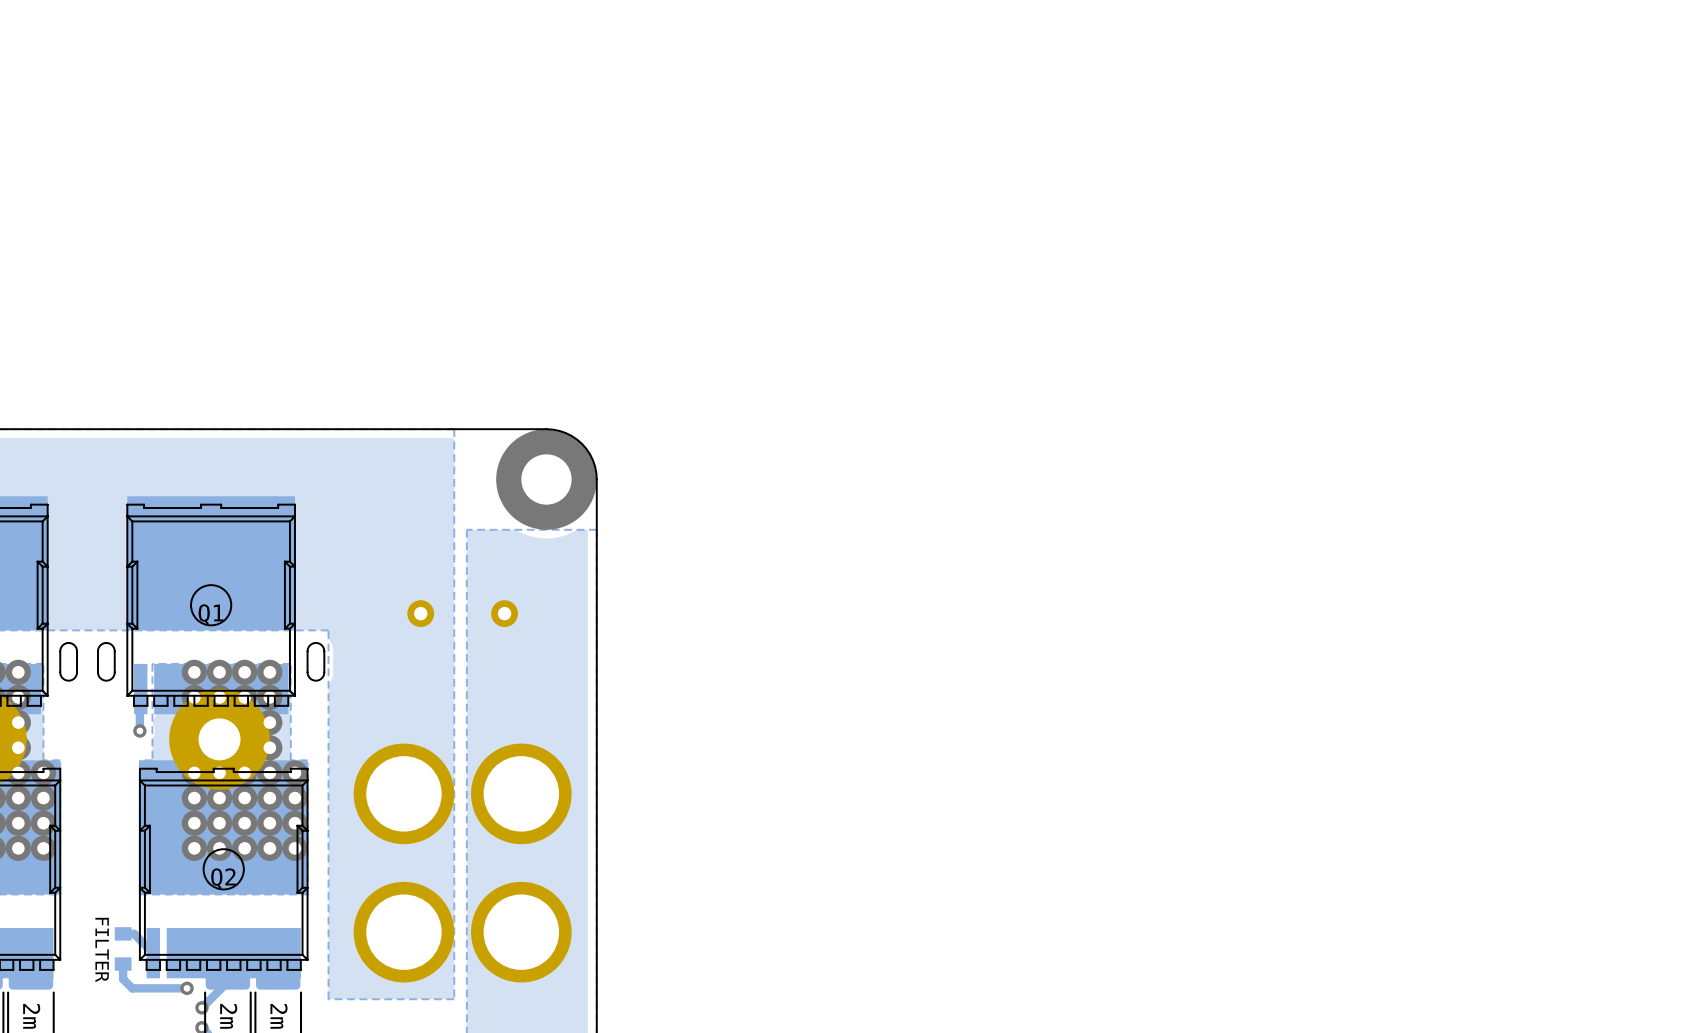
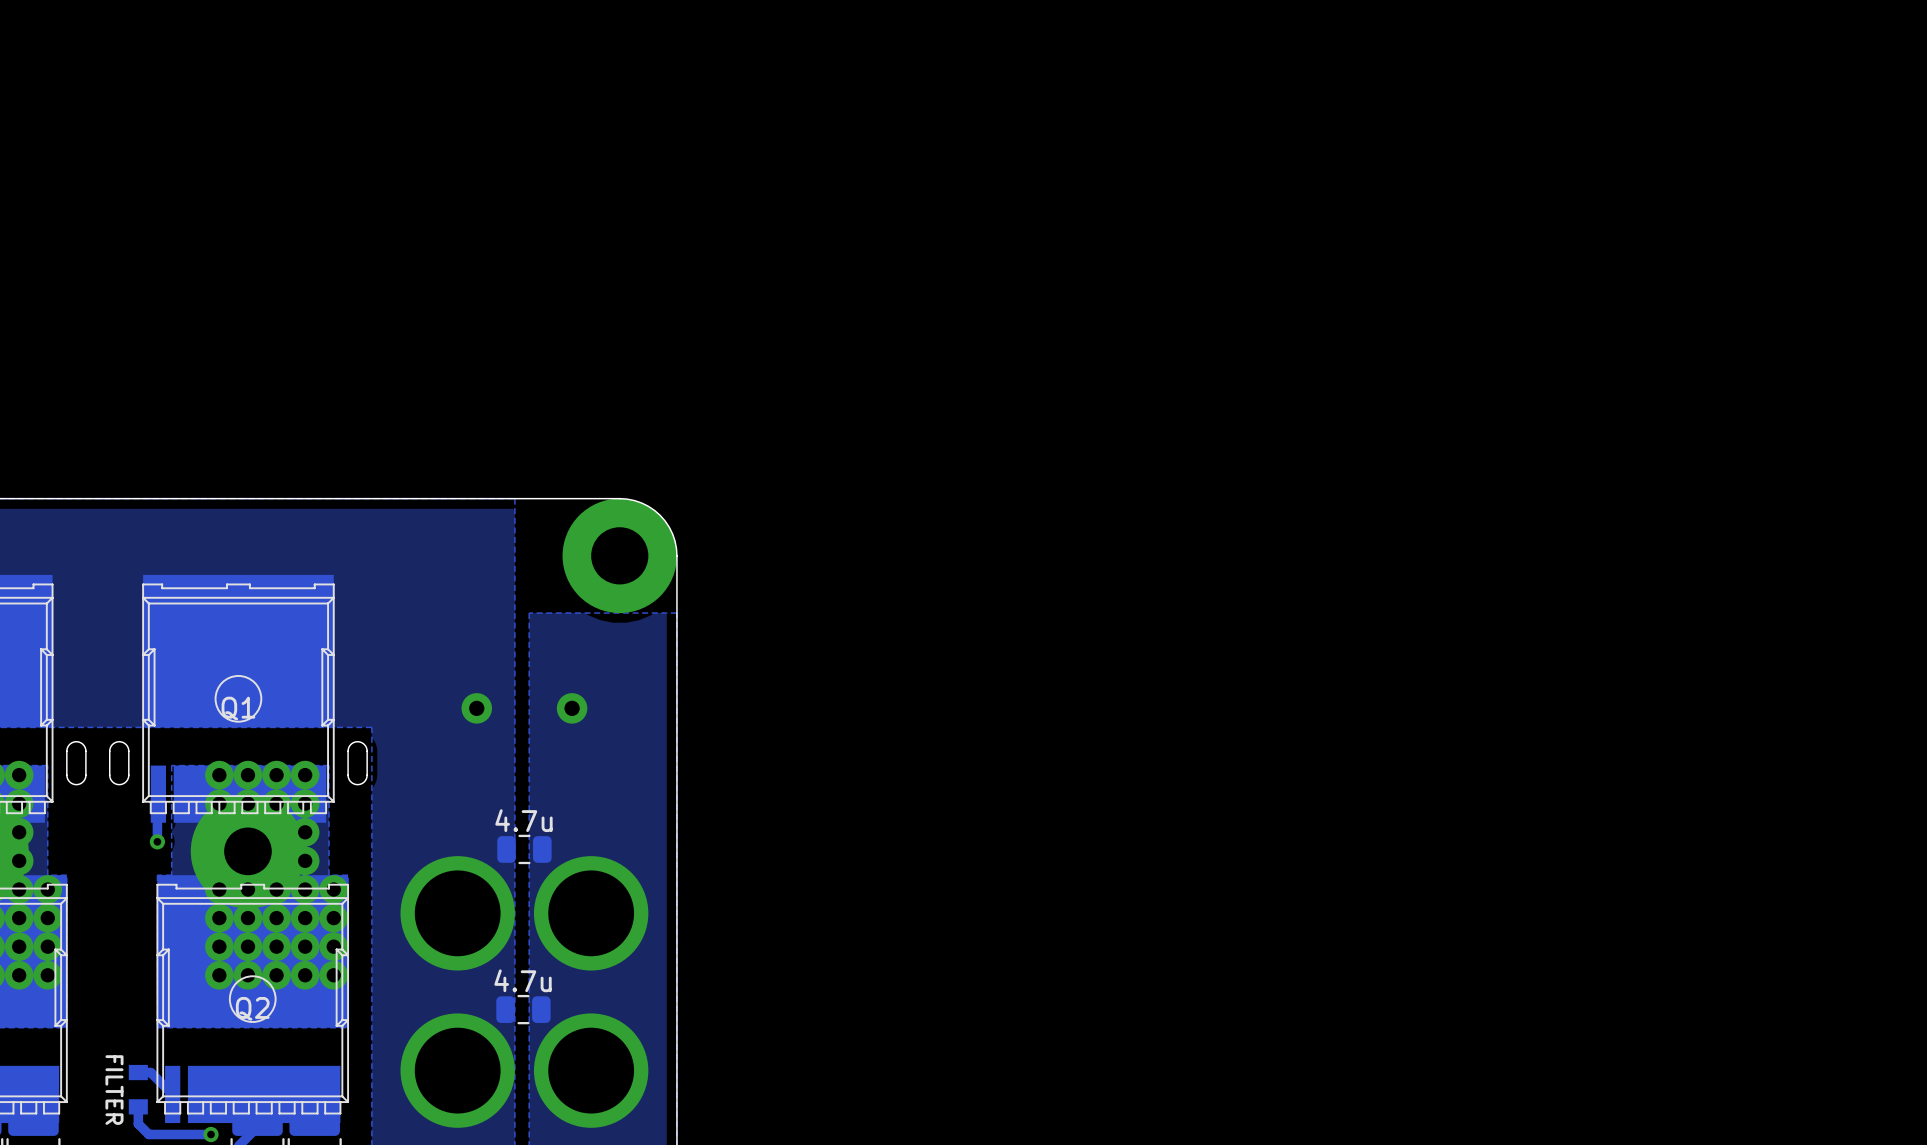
part: none -> 4.7u (524, 849)
part: none -> 4.7u (523, 1009)

